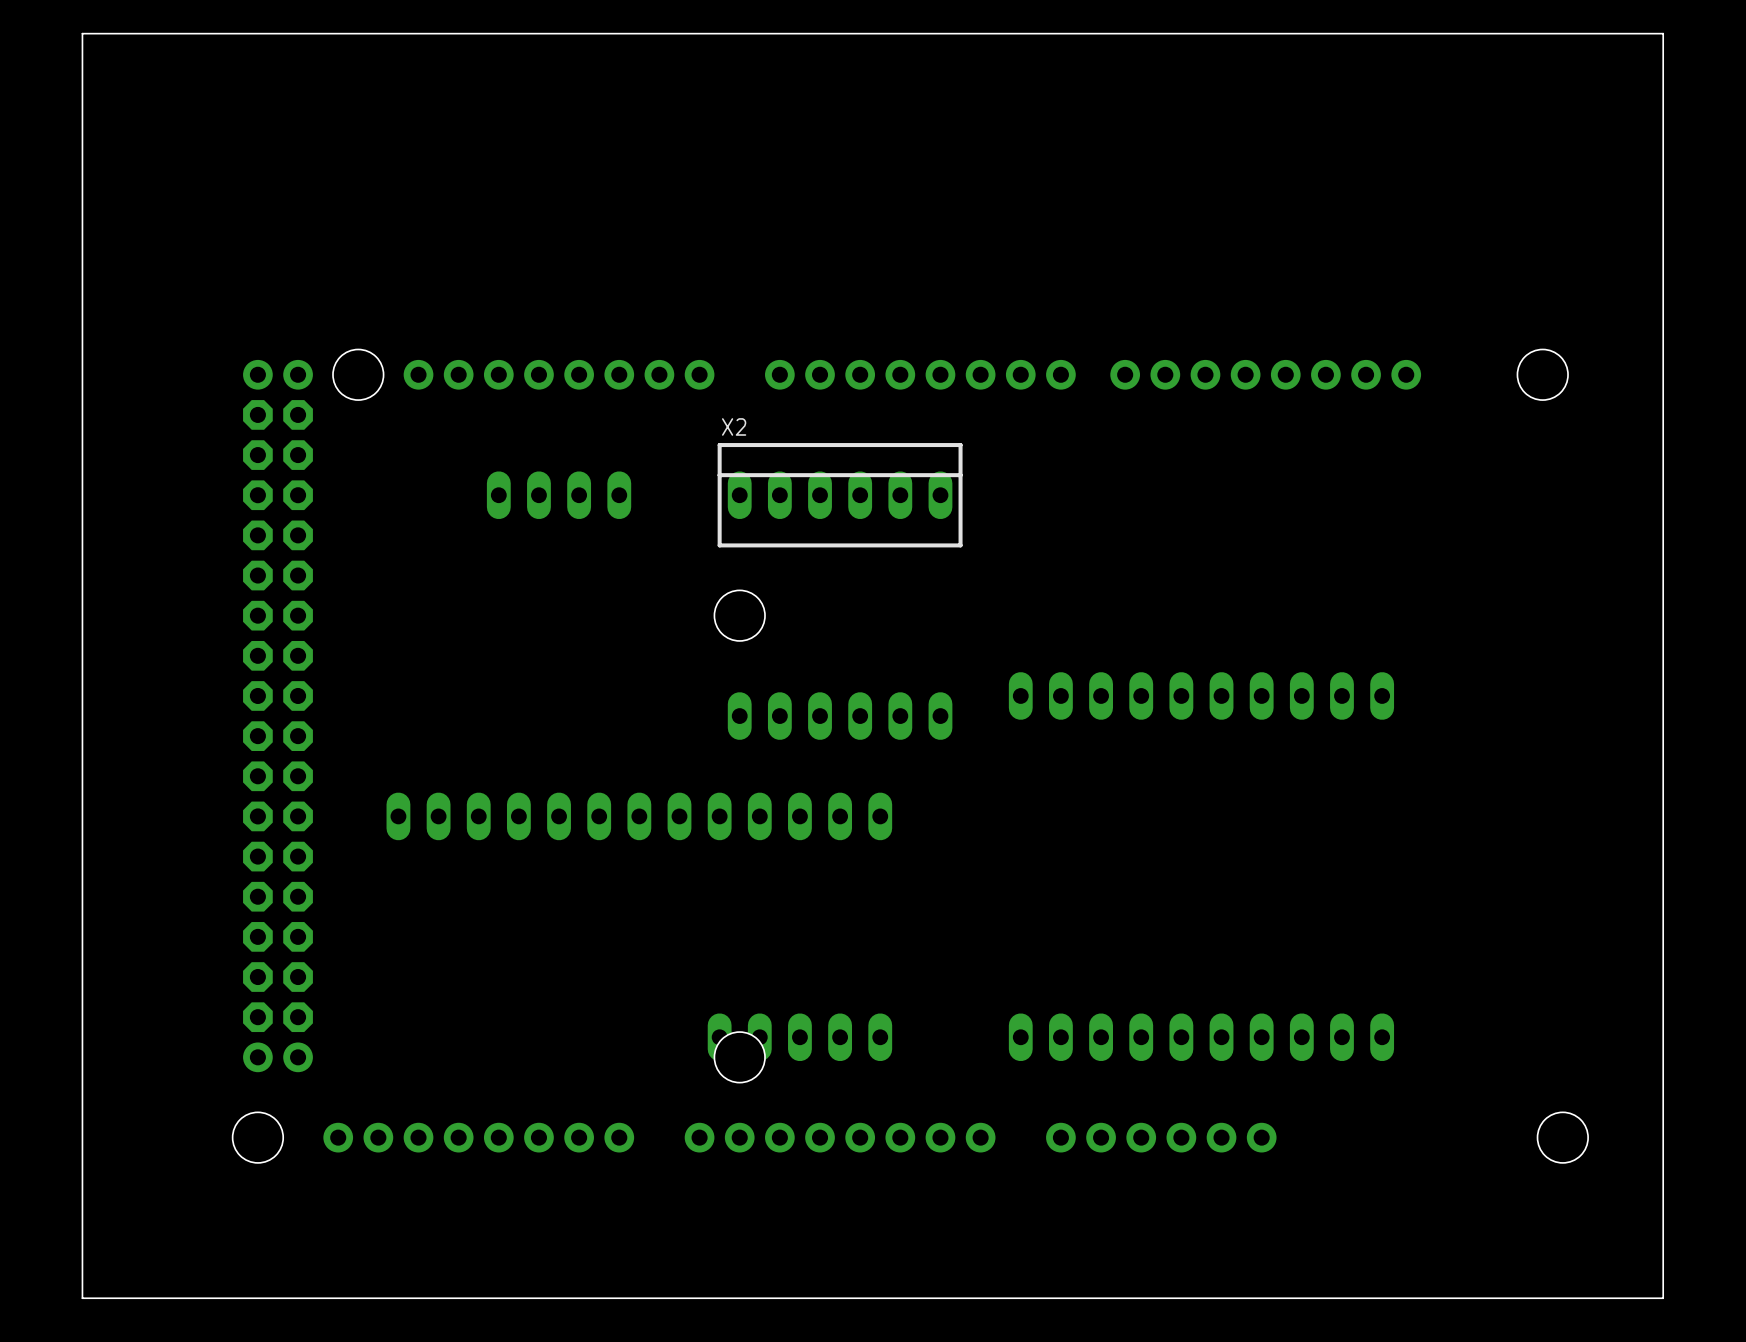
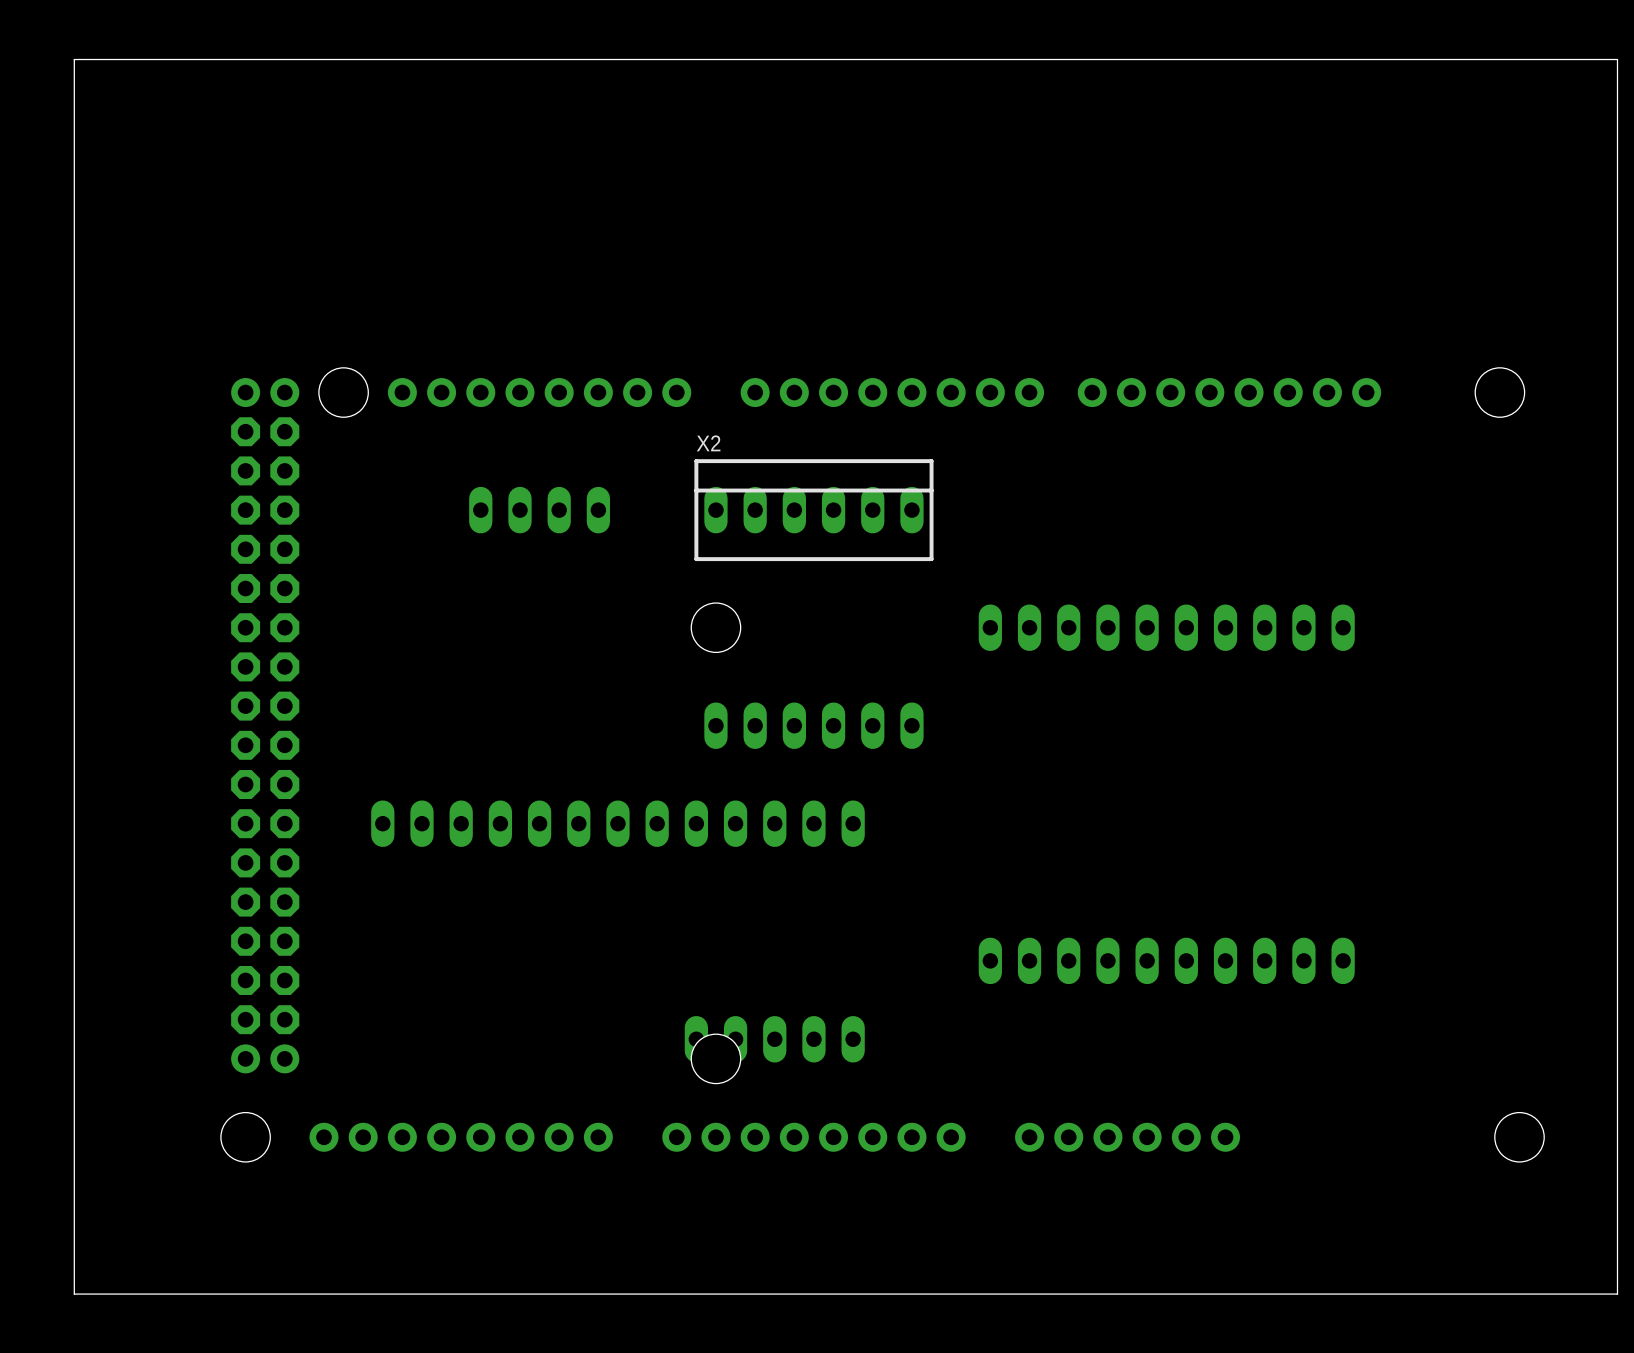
part position: (1201, 695) -> (1166, 627)
part position: (1201, 1037) -> (1166, 960)

